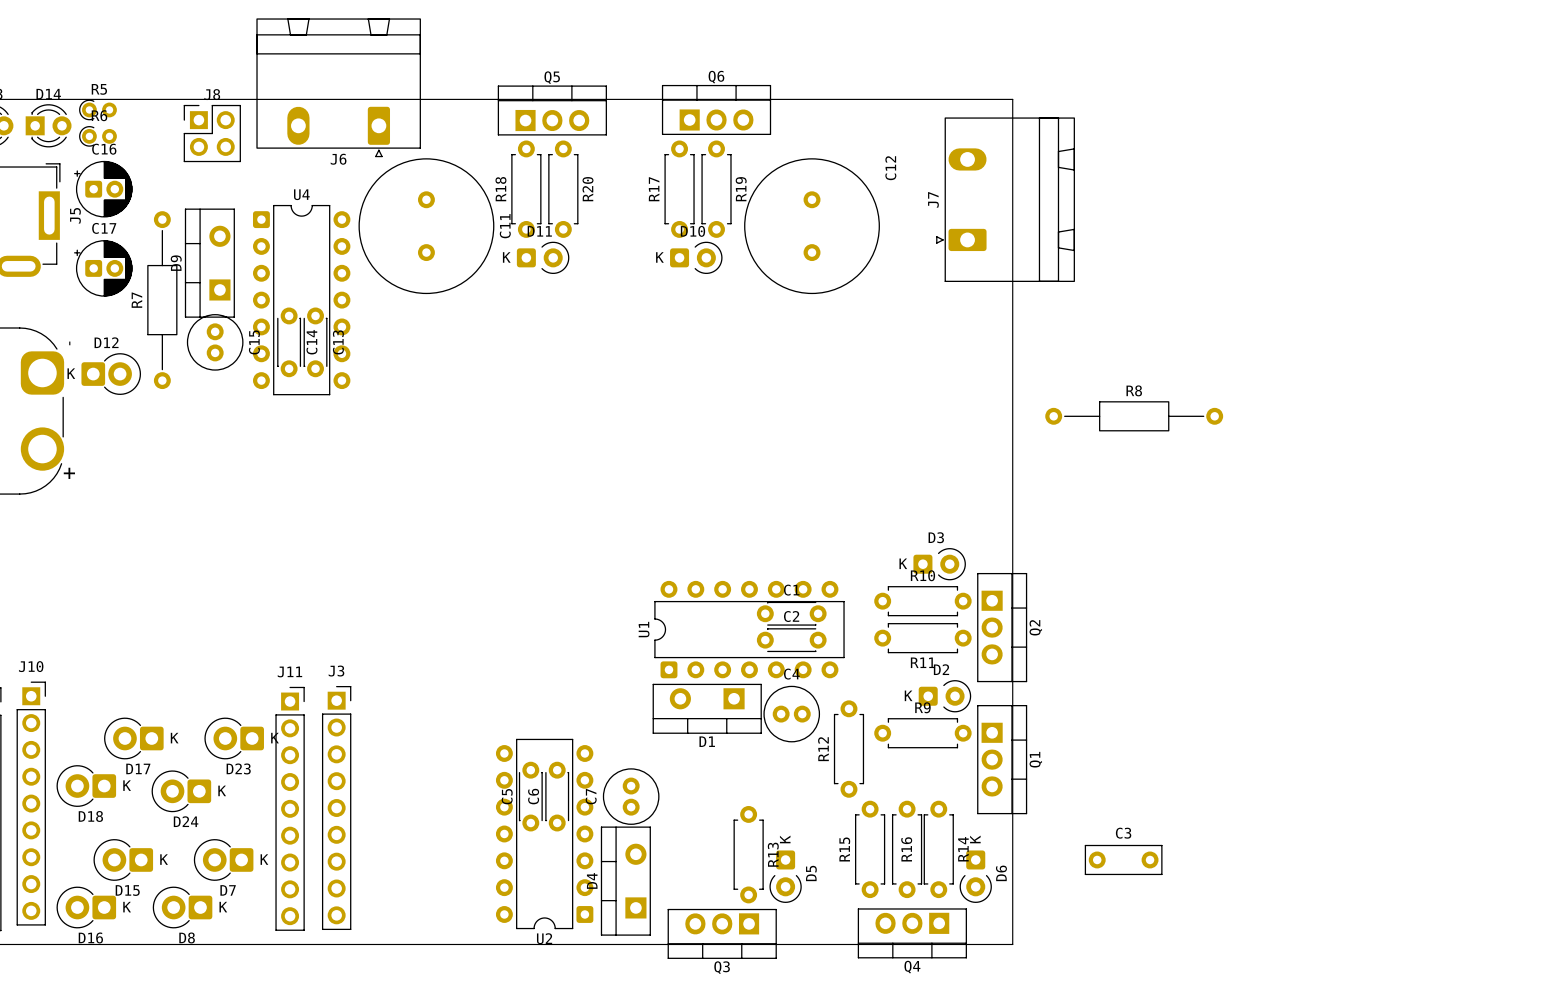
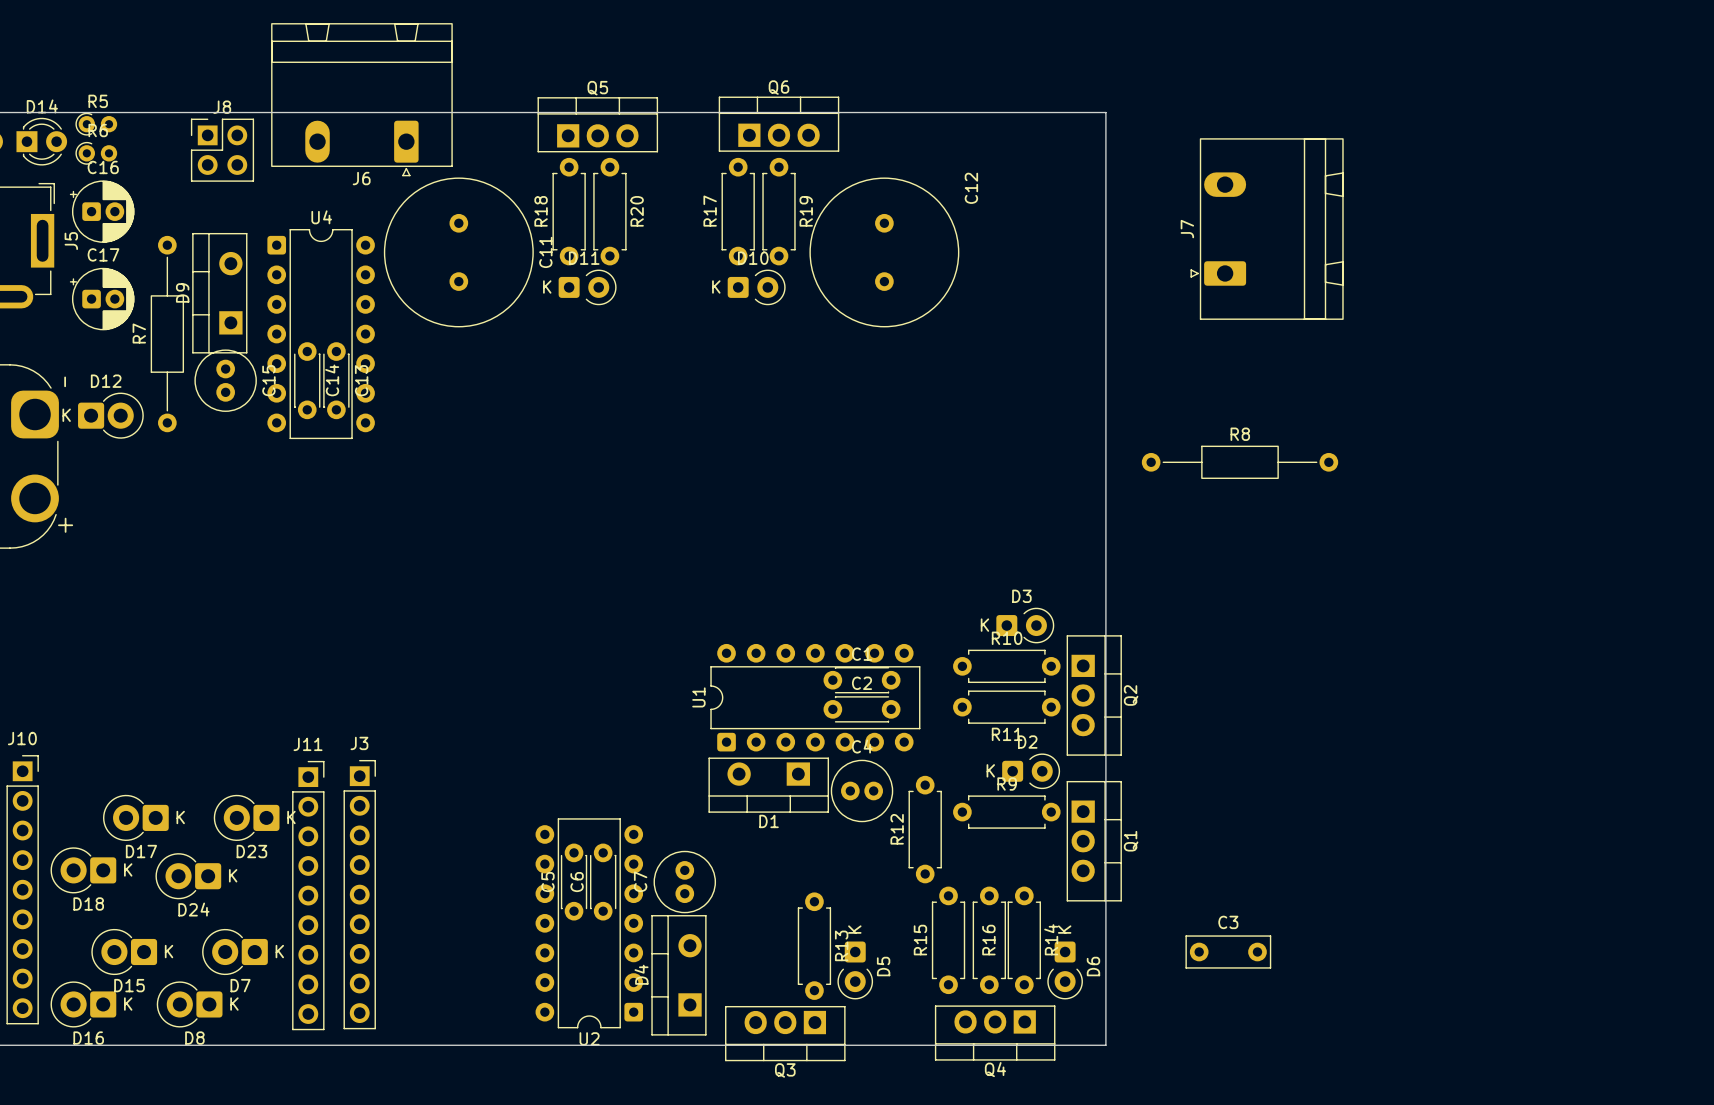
J7 position: (1005, 199) -> (1267, 229)

